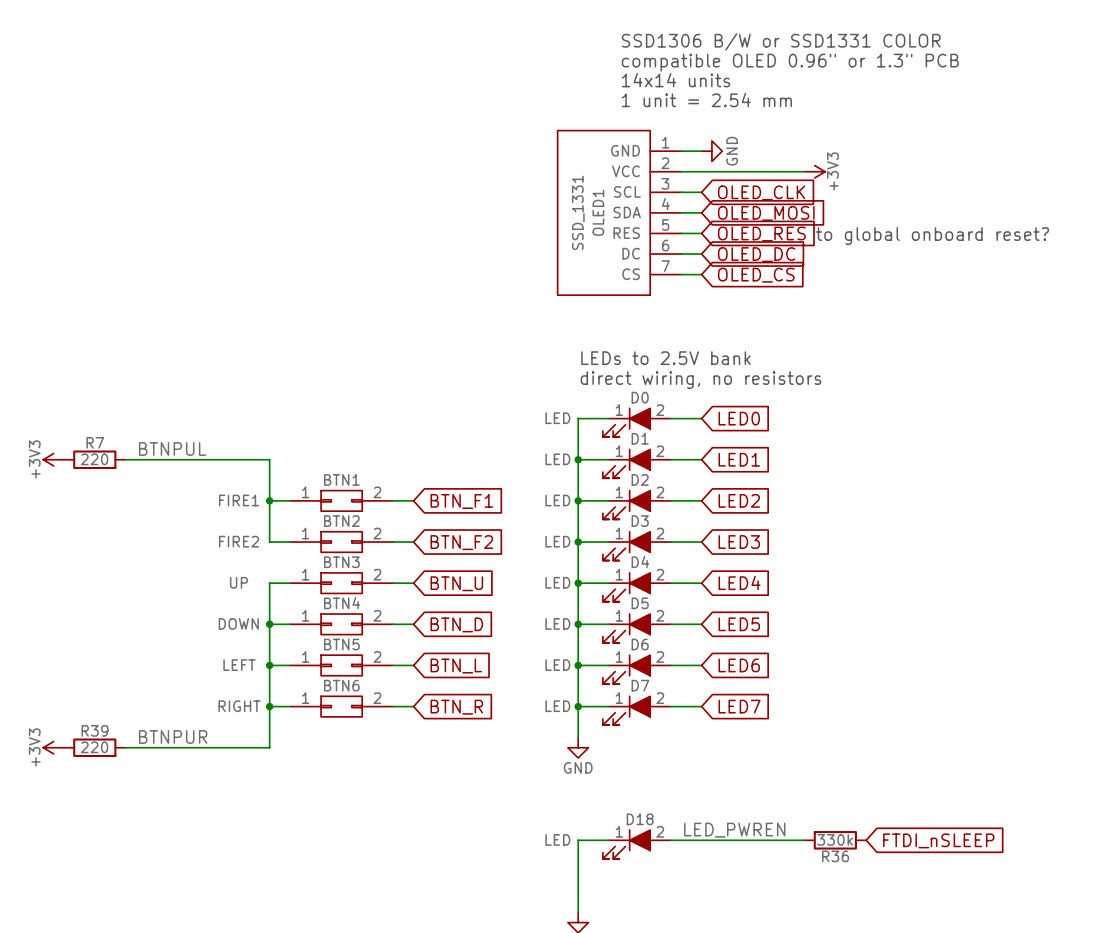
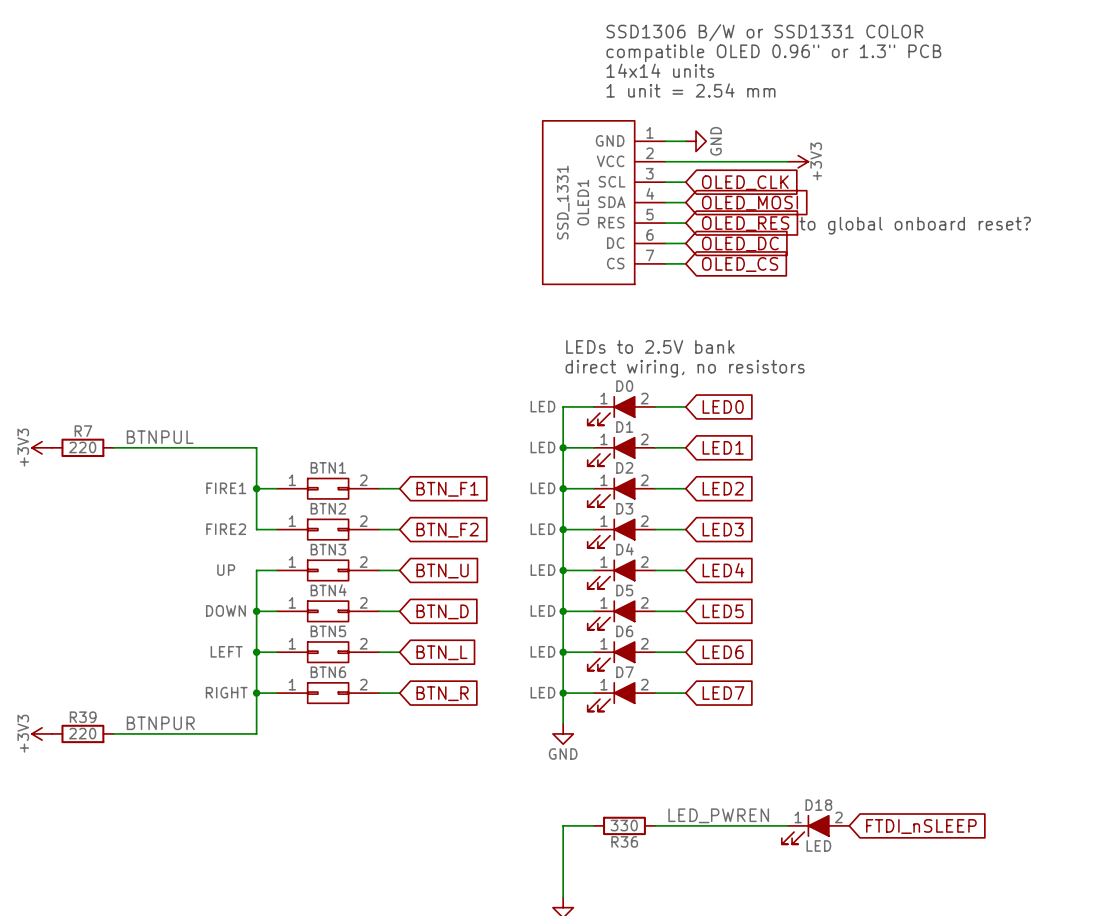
D18 value position: LED (557, 839) -> LED (818, 845)
R36 value: 330k (835, 839) -> 330 (624, 825)
R36 position: (835, 840) -> (624, 825)
D18 position: (636, 844) -> (815, 829)

